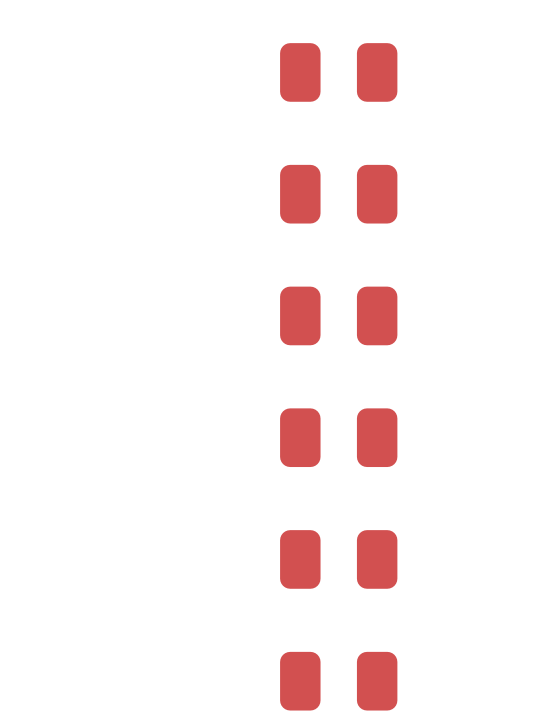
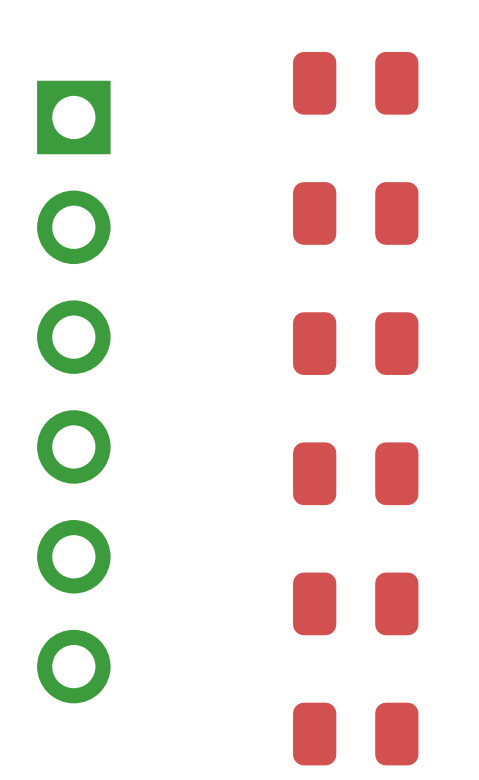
part: none -> (73, 392)

